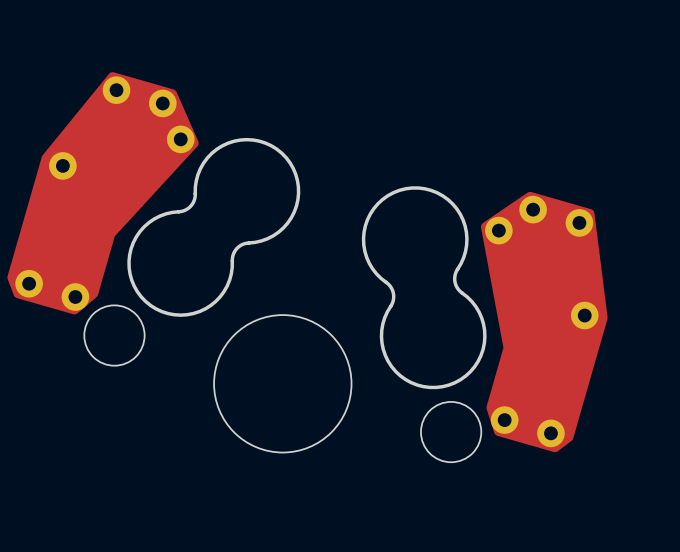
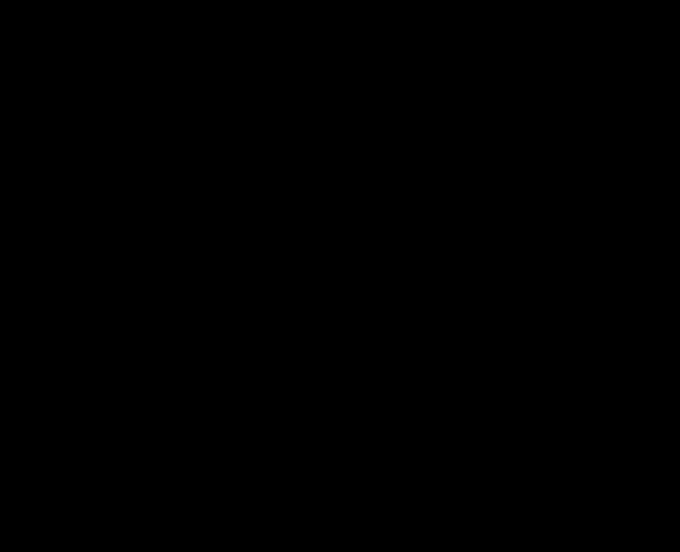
part: (307, 267) -> none

